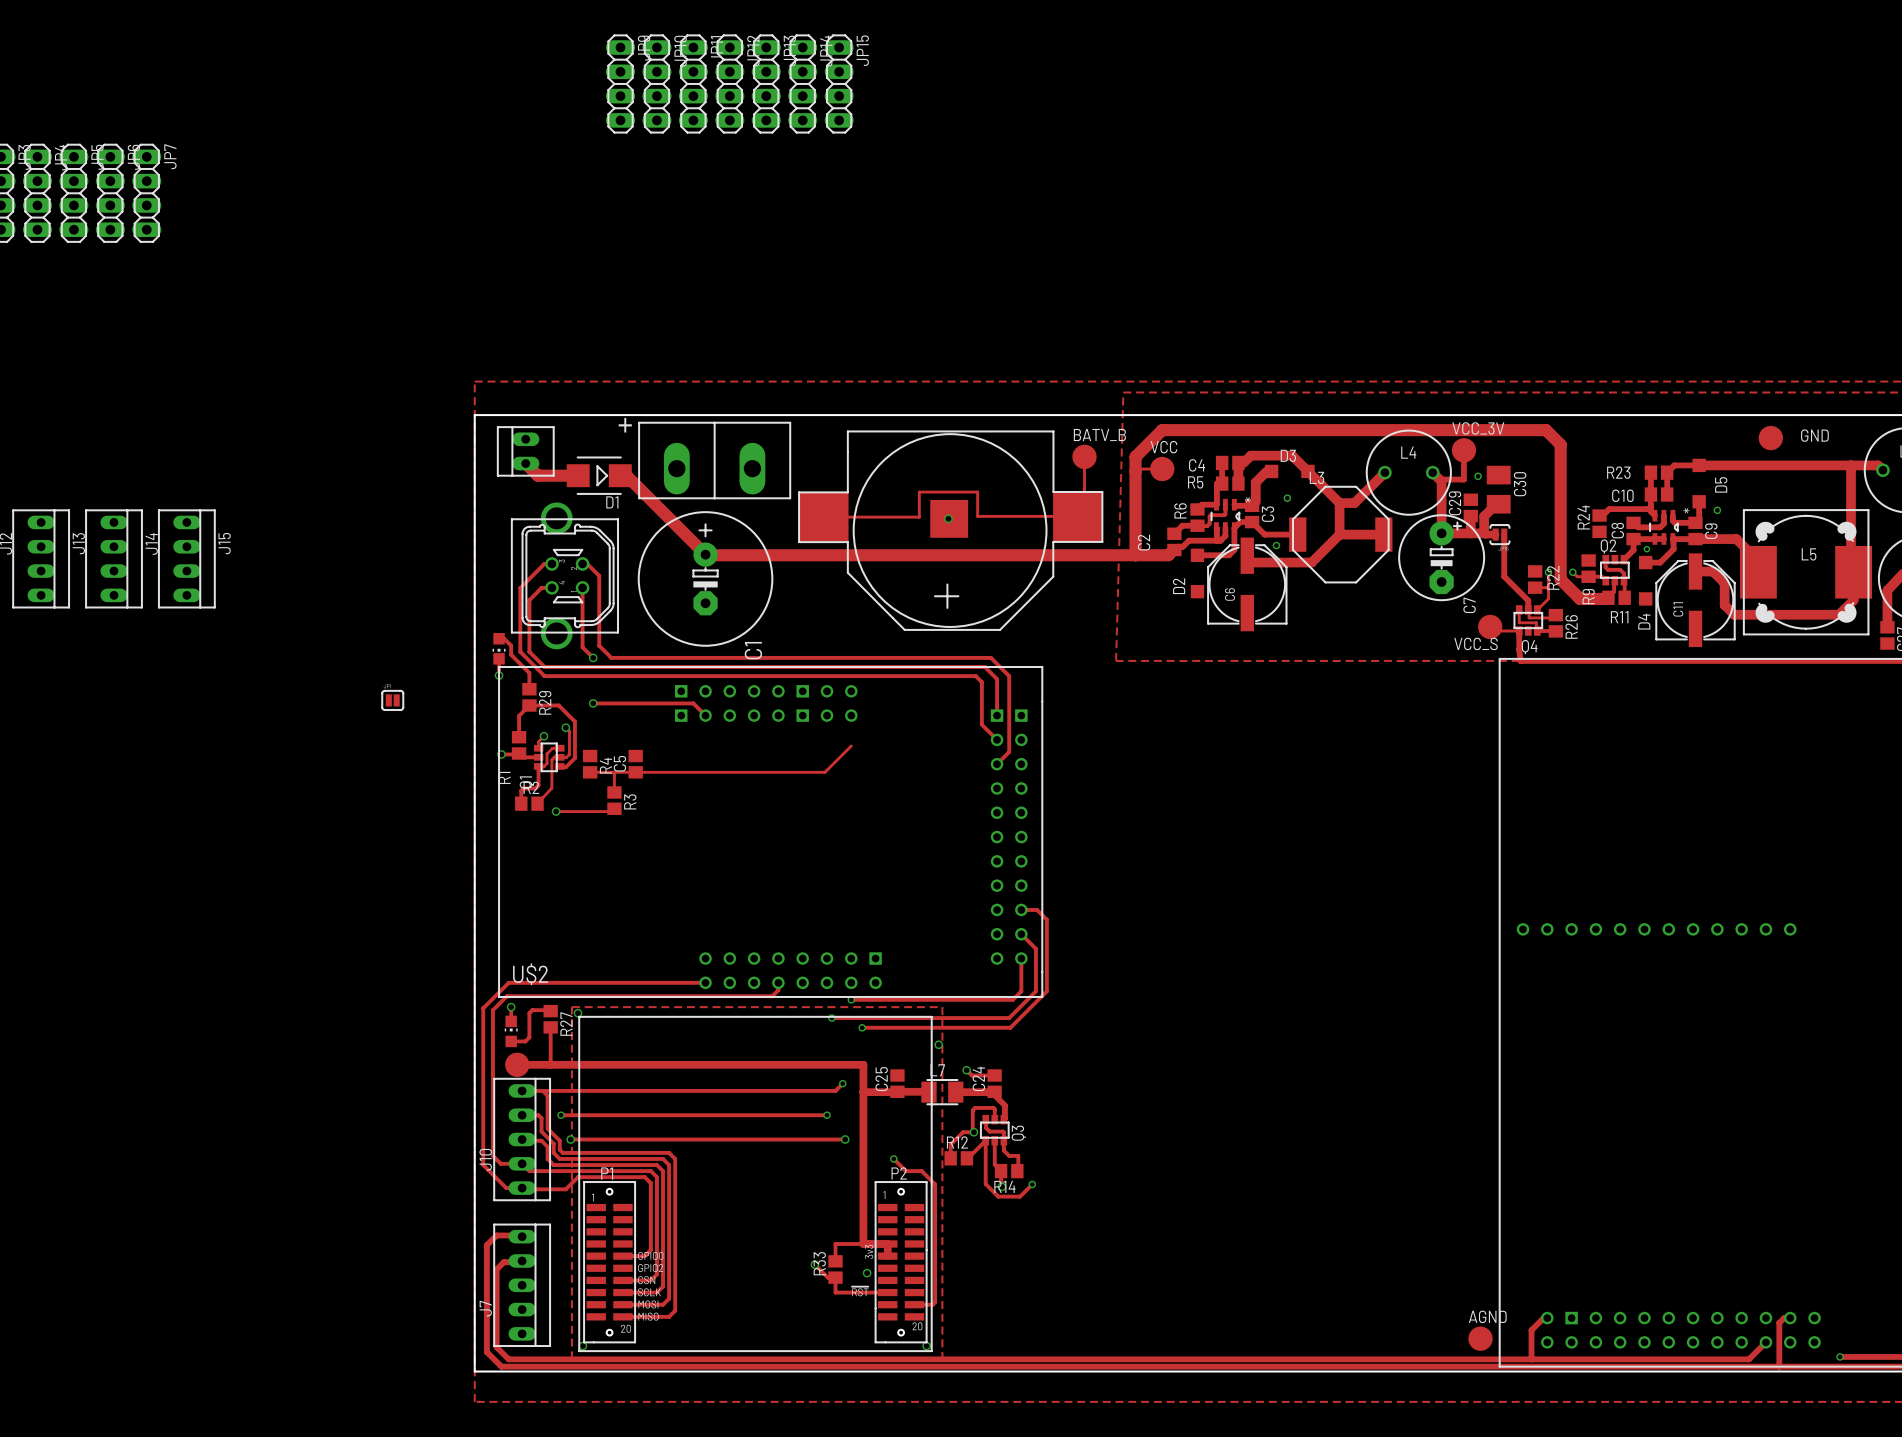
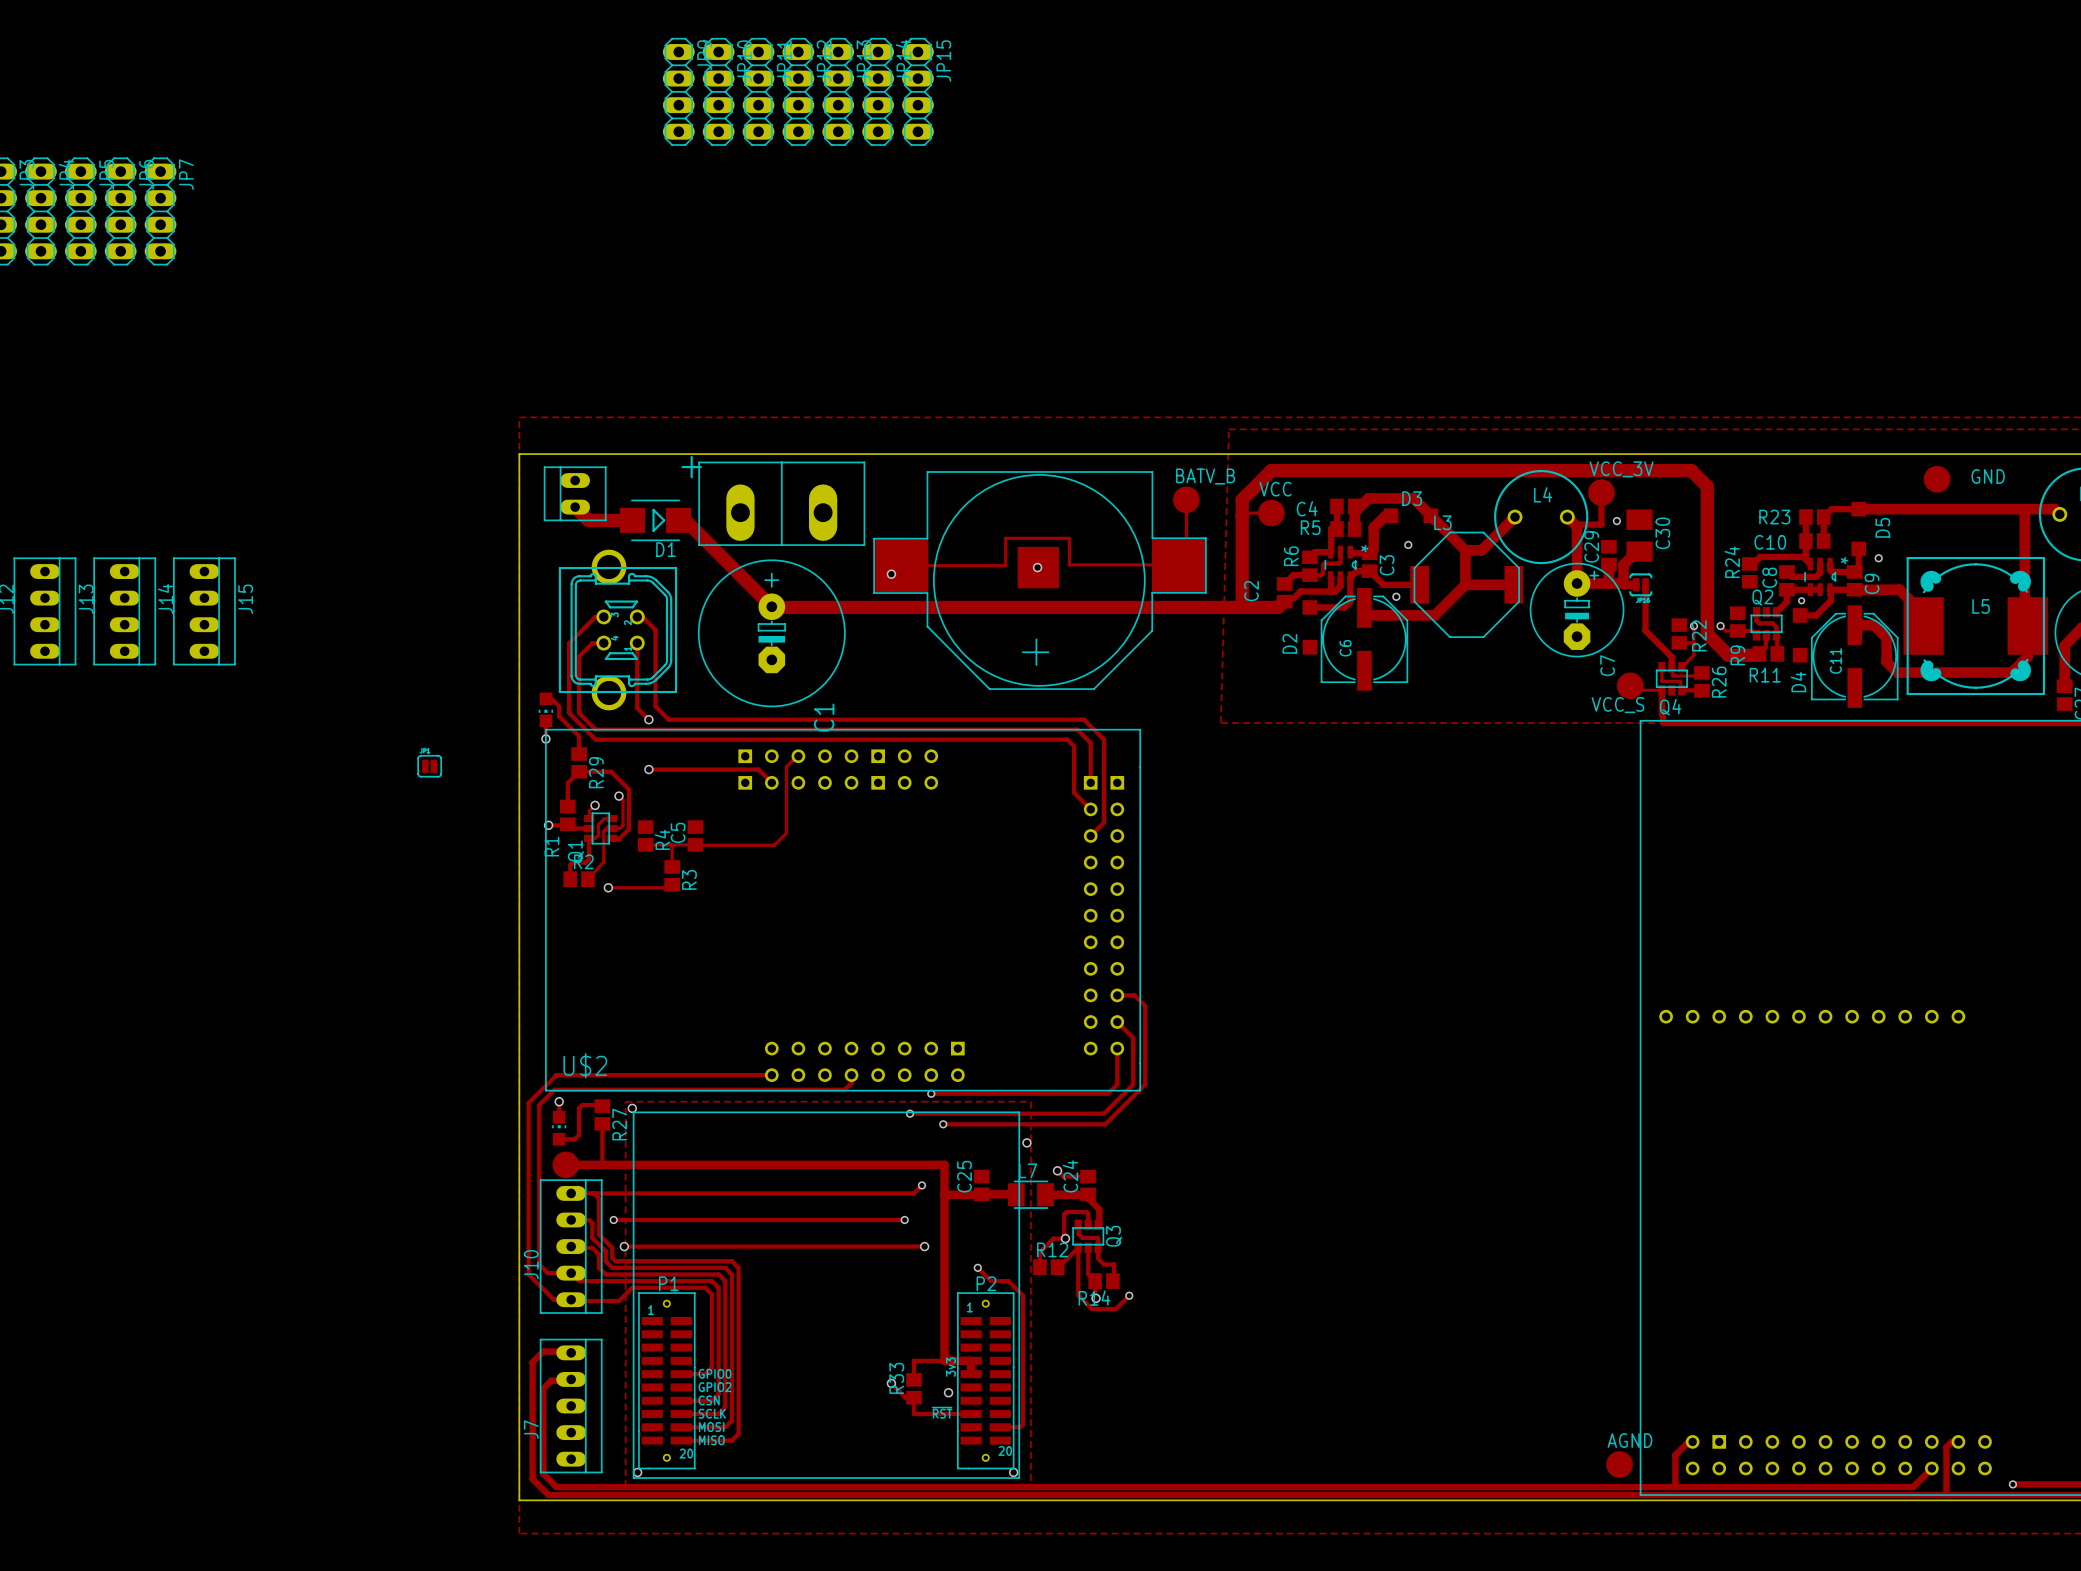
via: none -> (891, 574)
track: (851, 745) (824, 772) (635, 772) -> (798, 756) (786, 766) (786, 833) (774, 845) (695, 844)

